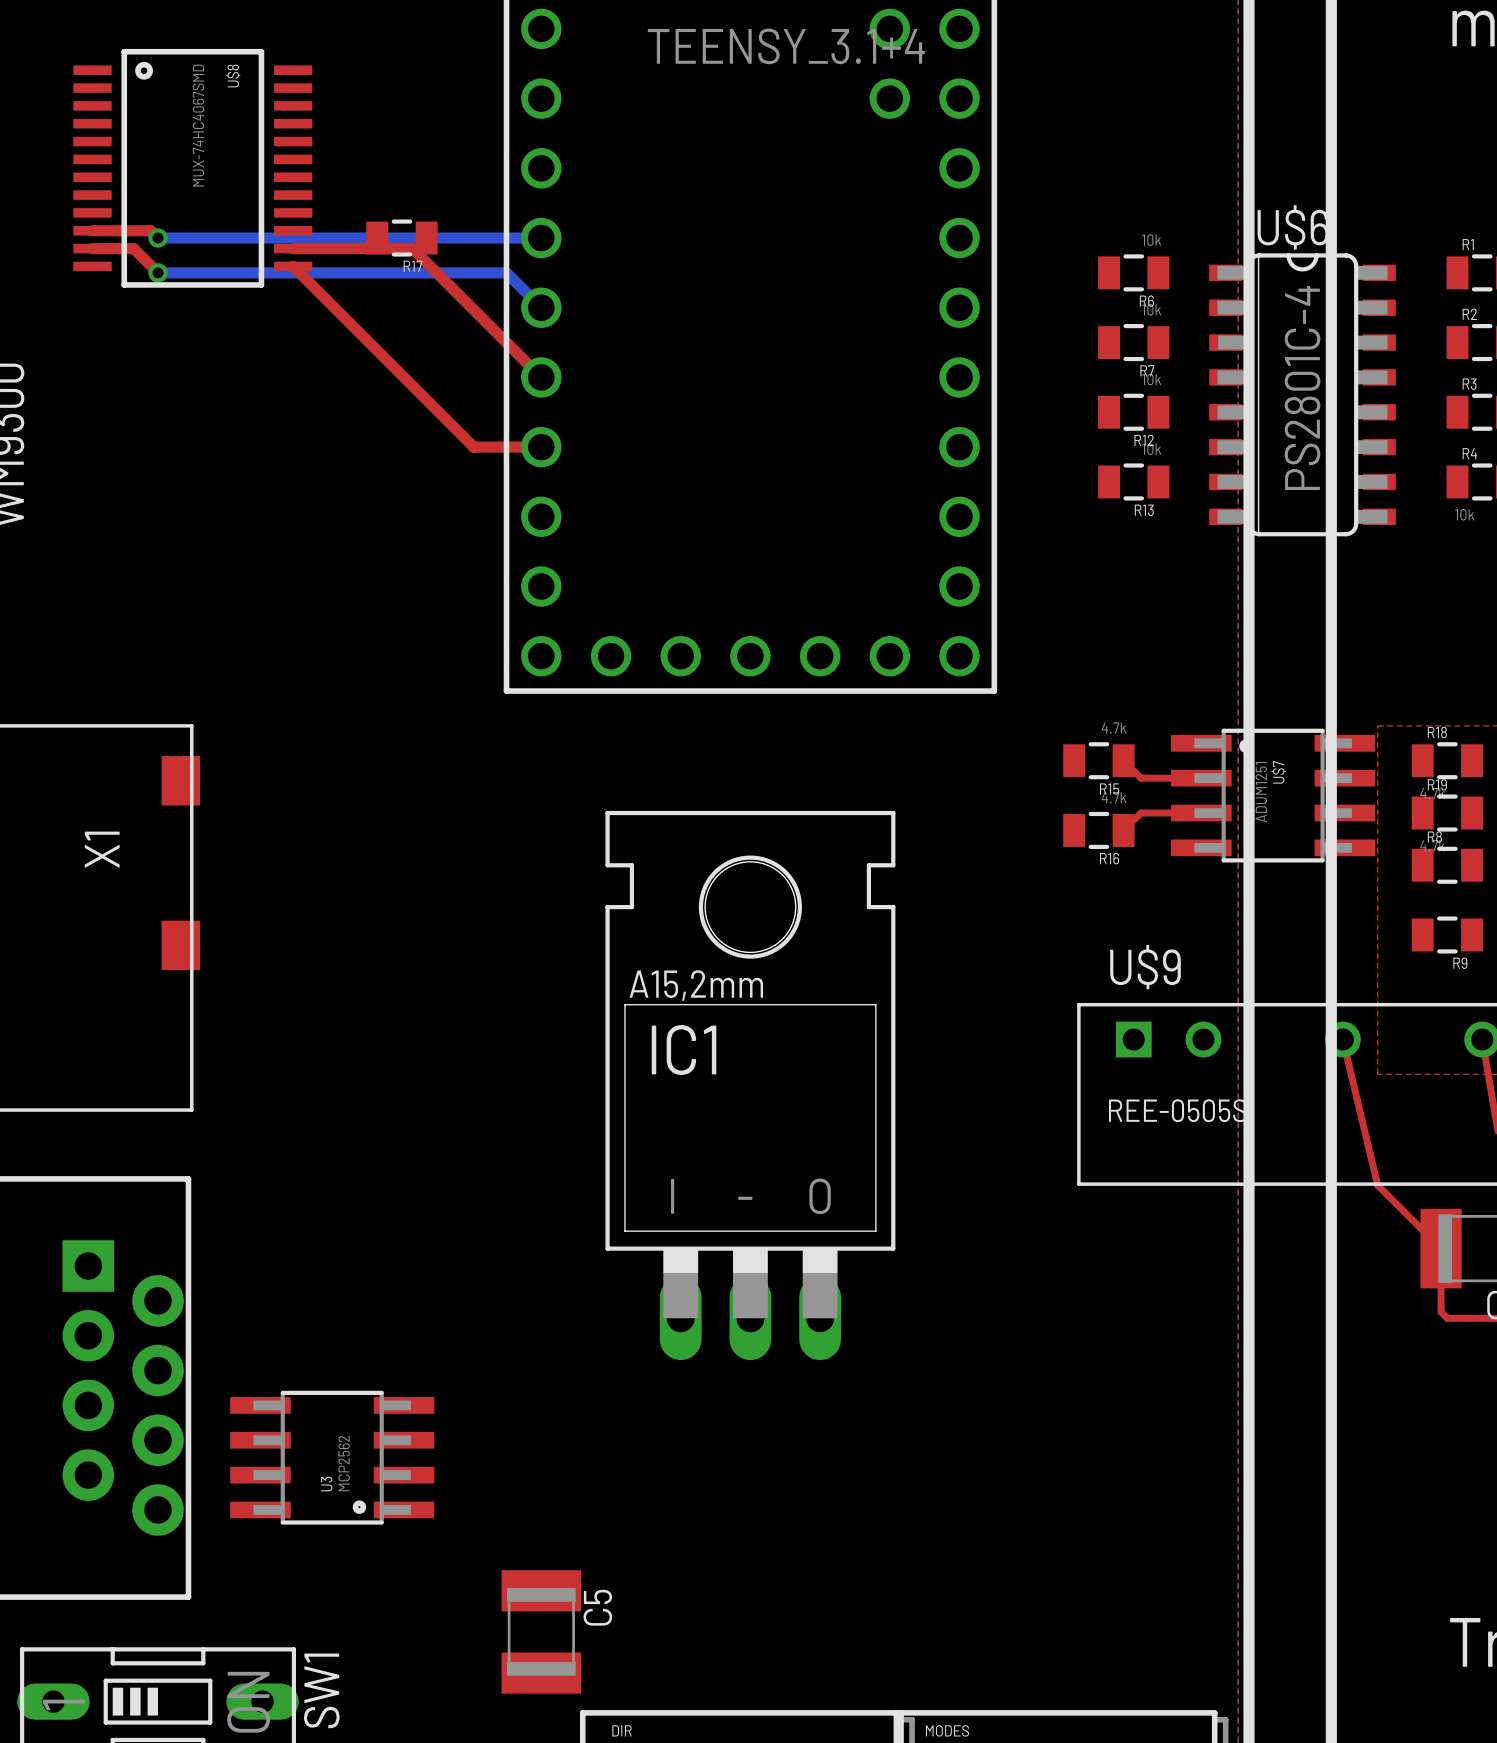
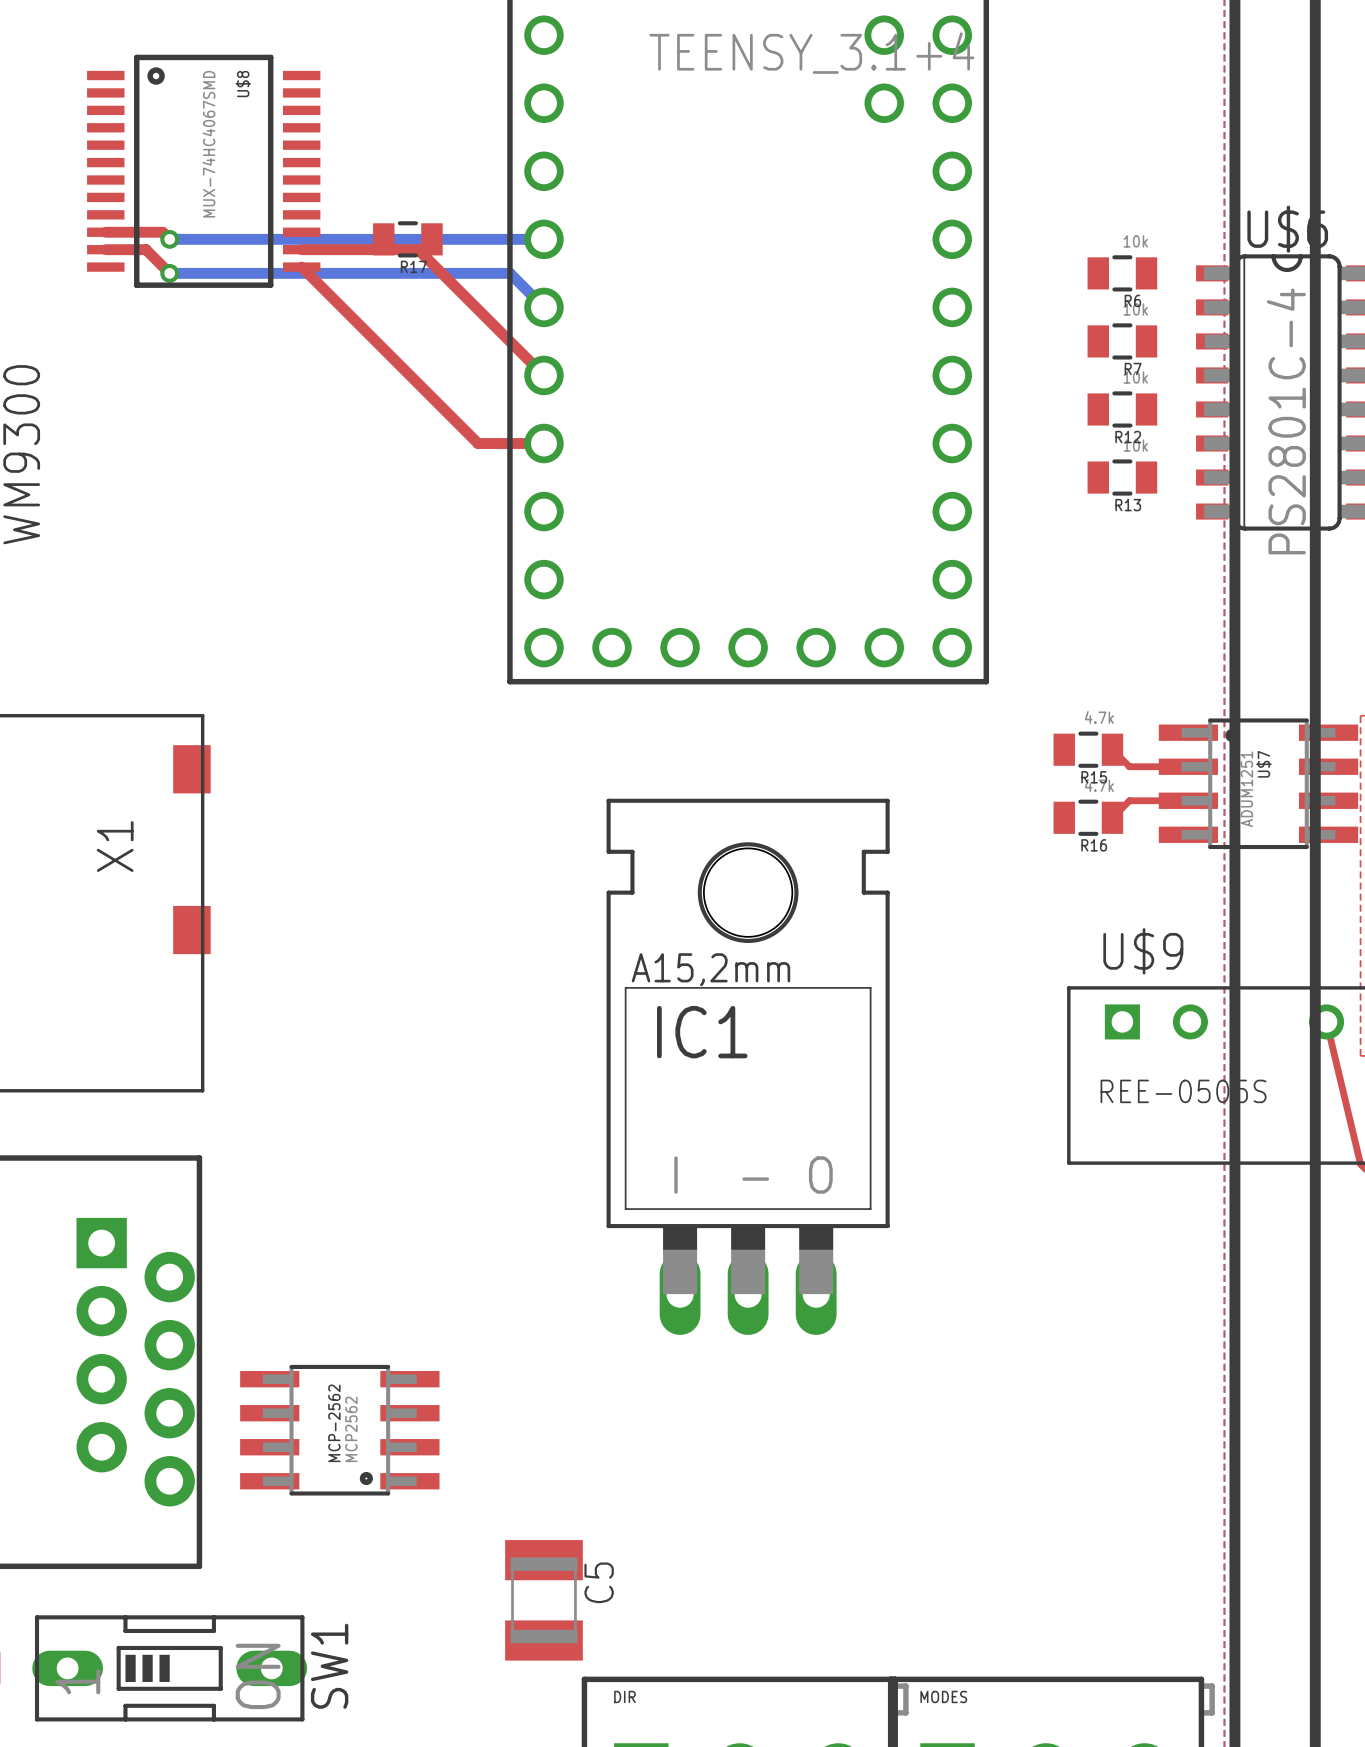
U3 name: U3 (326, 1484) -> MCP-2562 (334, 1423)

